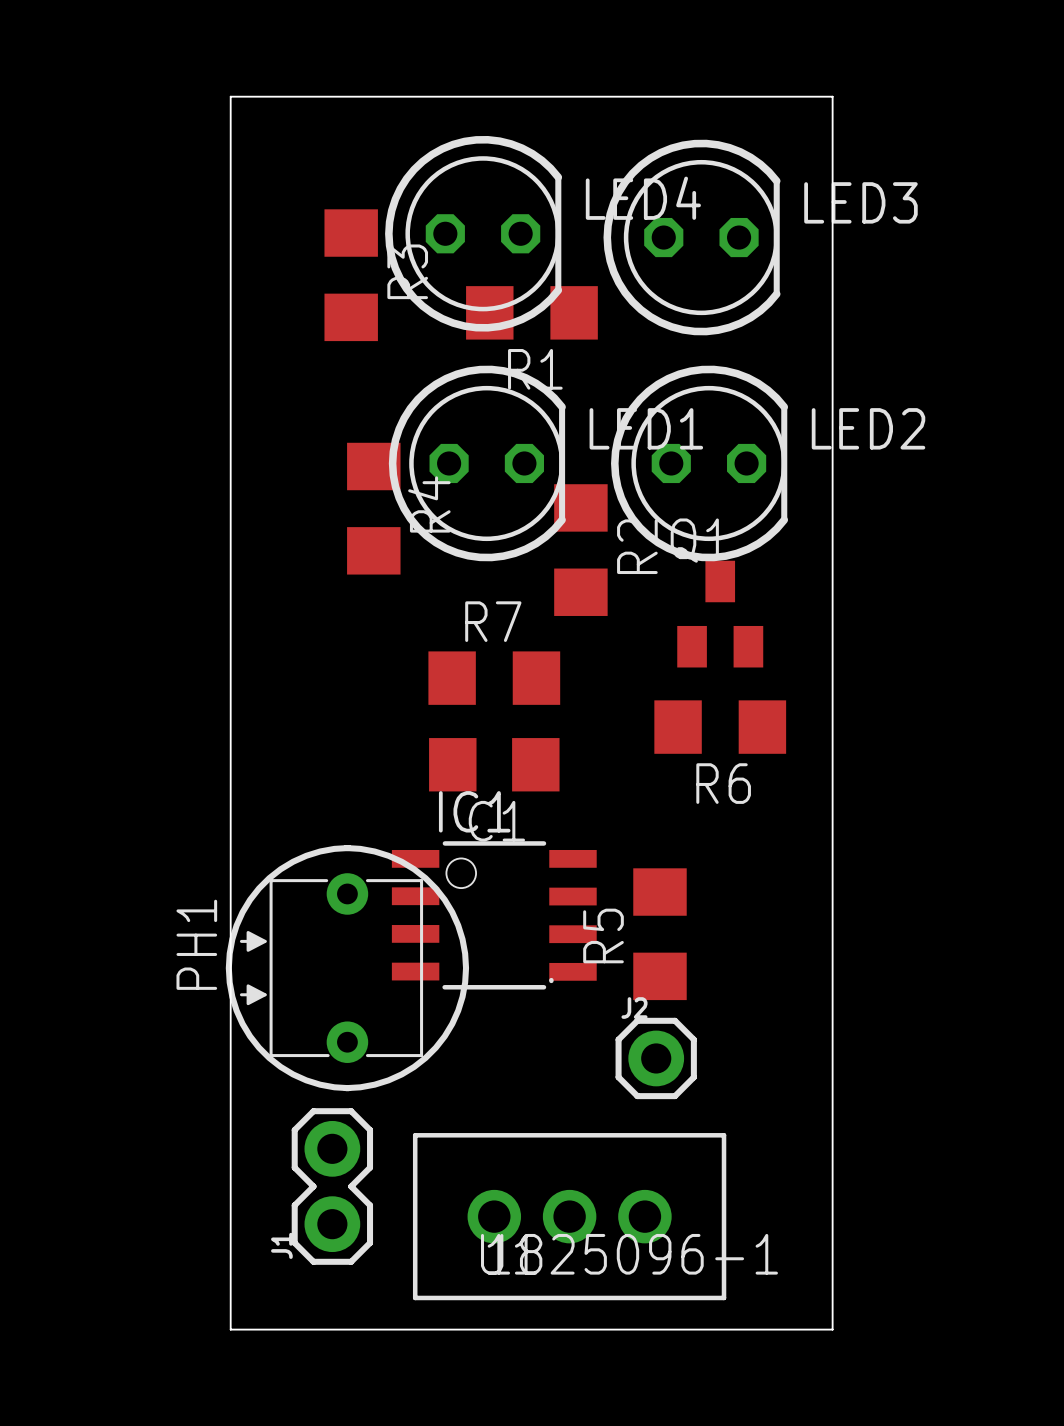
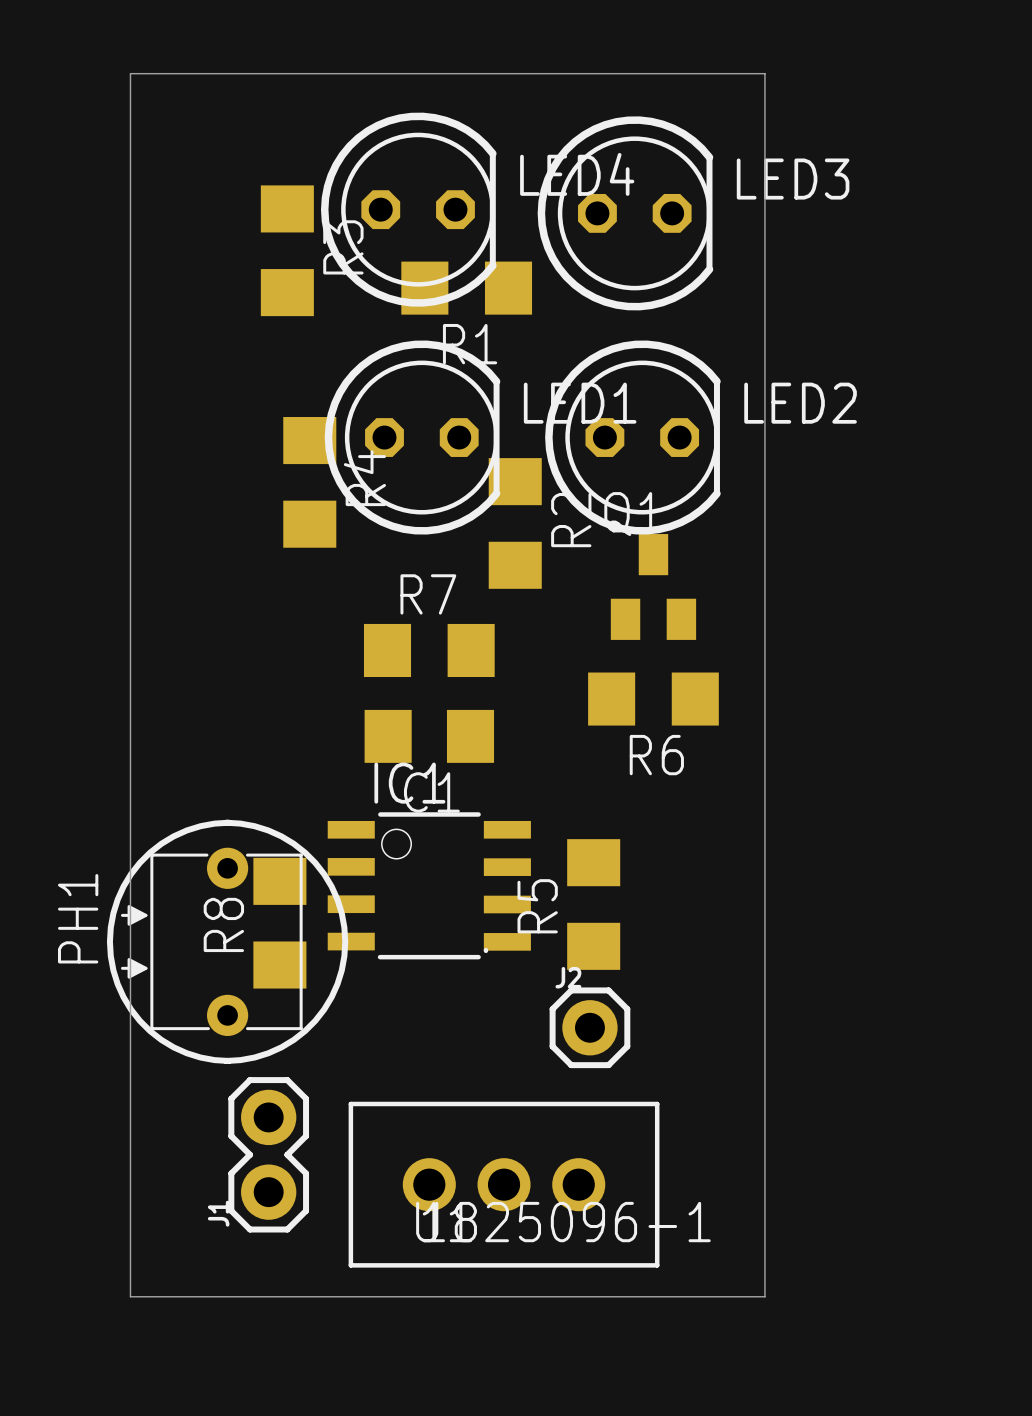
board edge: (230, 96) (230, 1329) -> (167, 73) (130, 73) (130, 1296) (167, 1296)
R8: none -> (279, 923)
PH1 position: (347, 968) -> (227, 941)

